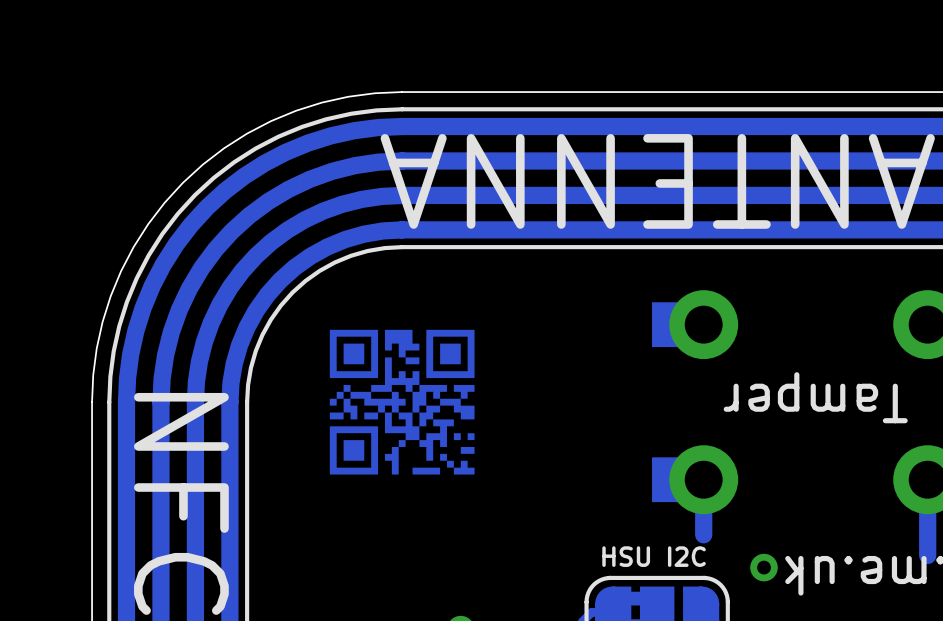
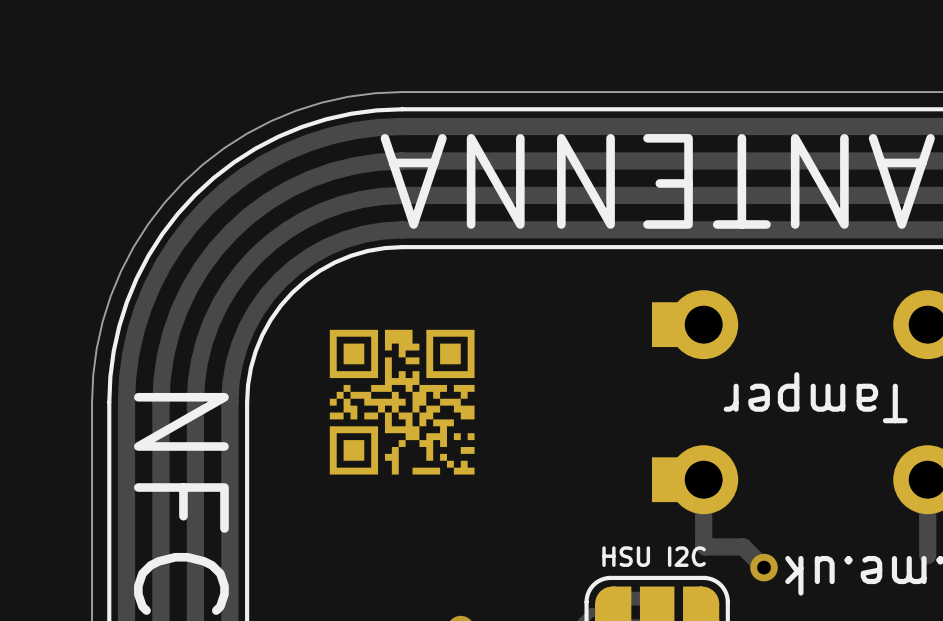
track: none -> (703, 534) (705, 546) (743, 546) (764, 567)

